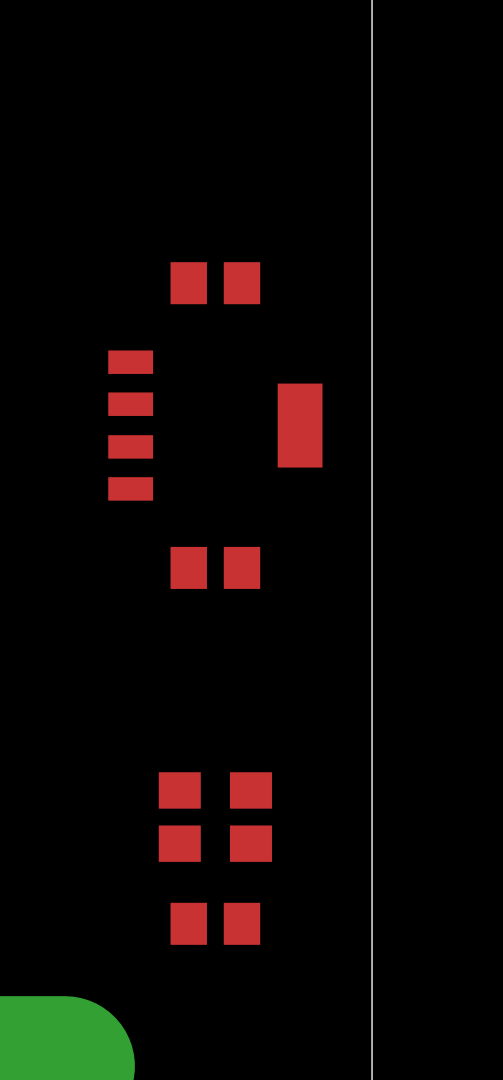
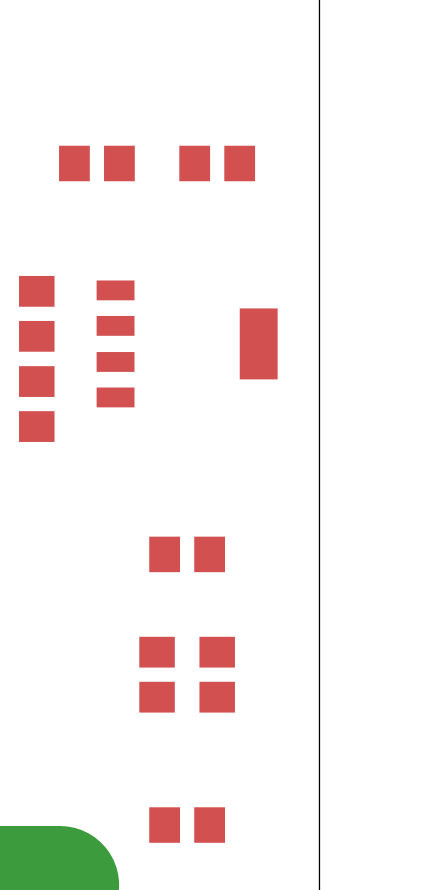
part: none -> (96, 163)
part: none -> (217, 163)
part: (215, 283) -> none
part: none -> (36, 313)
part: none -> (36, 404)
part: (215, 567) -> none
part: none -> (187, 554)
part position: (215, 923) -> (187, 825)

